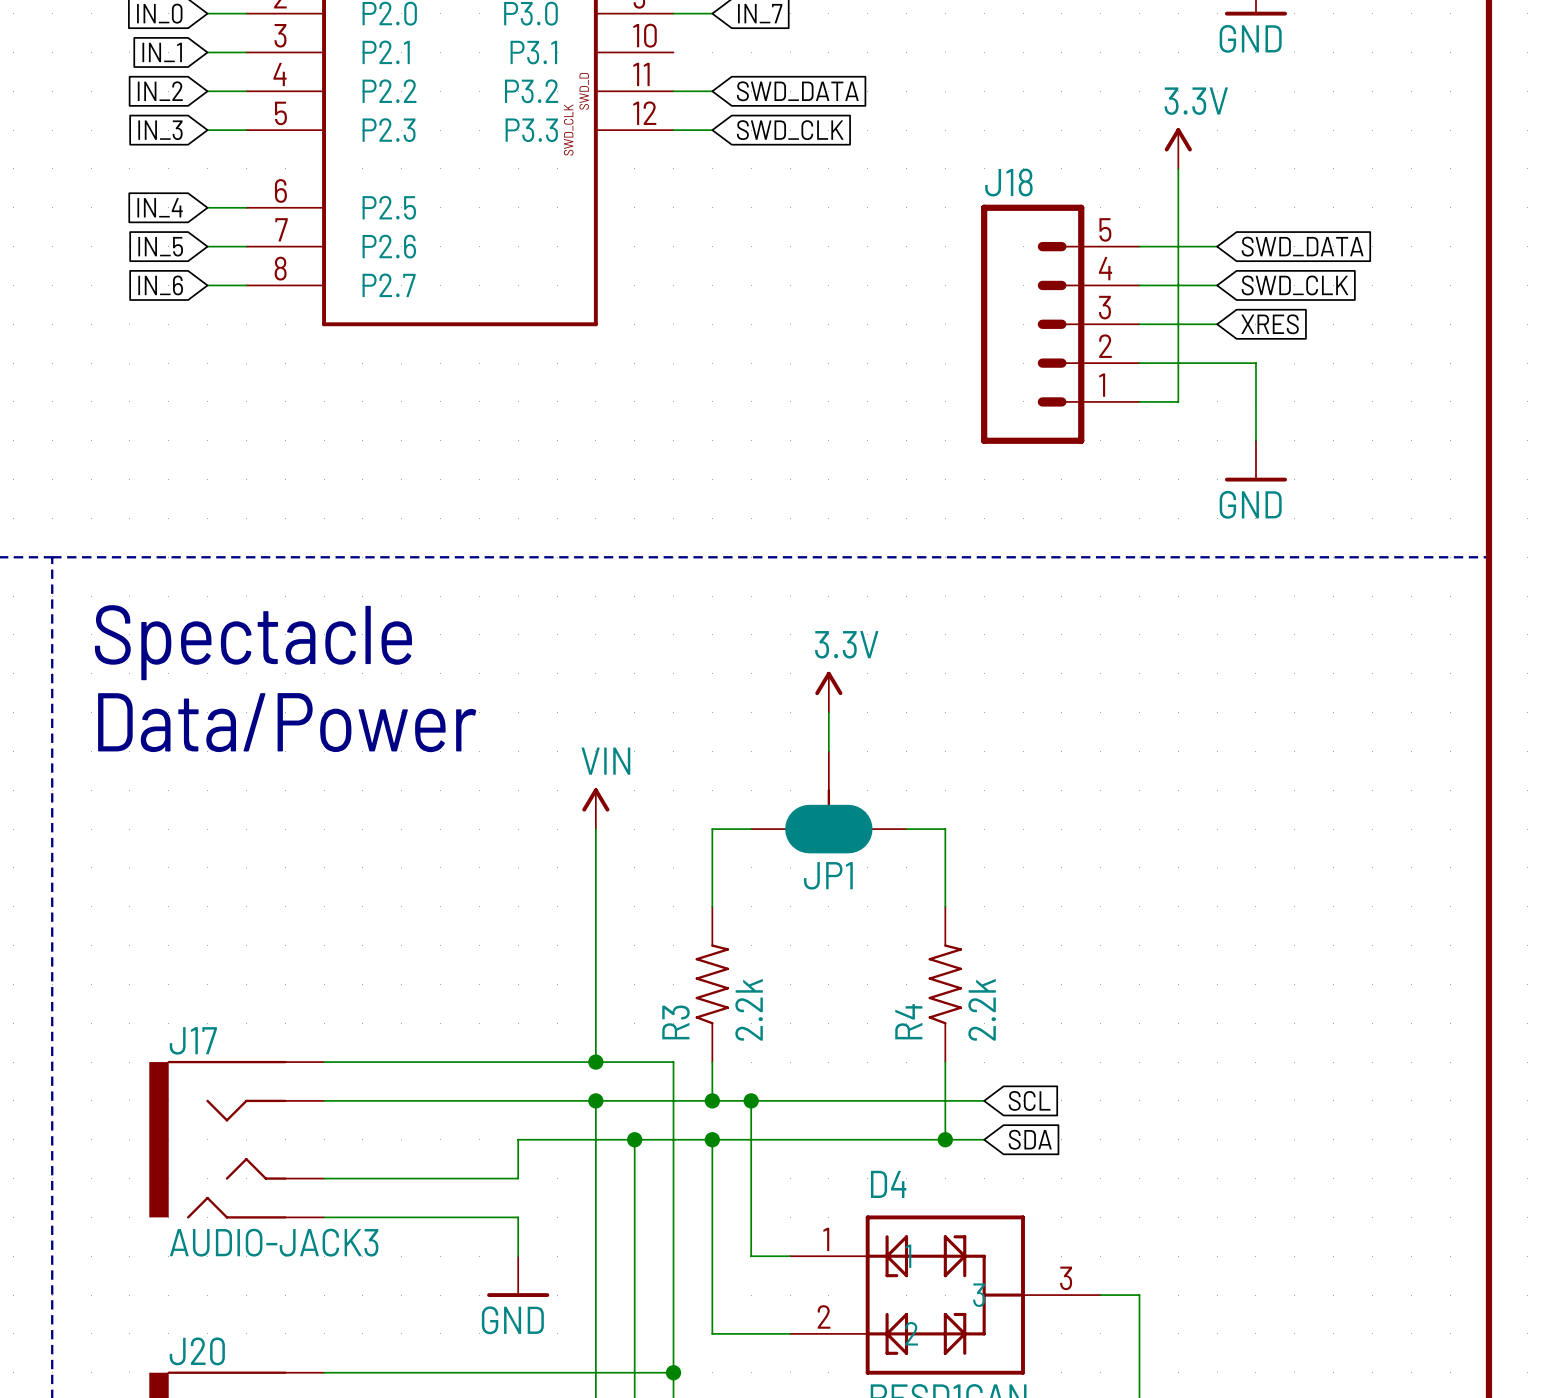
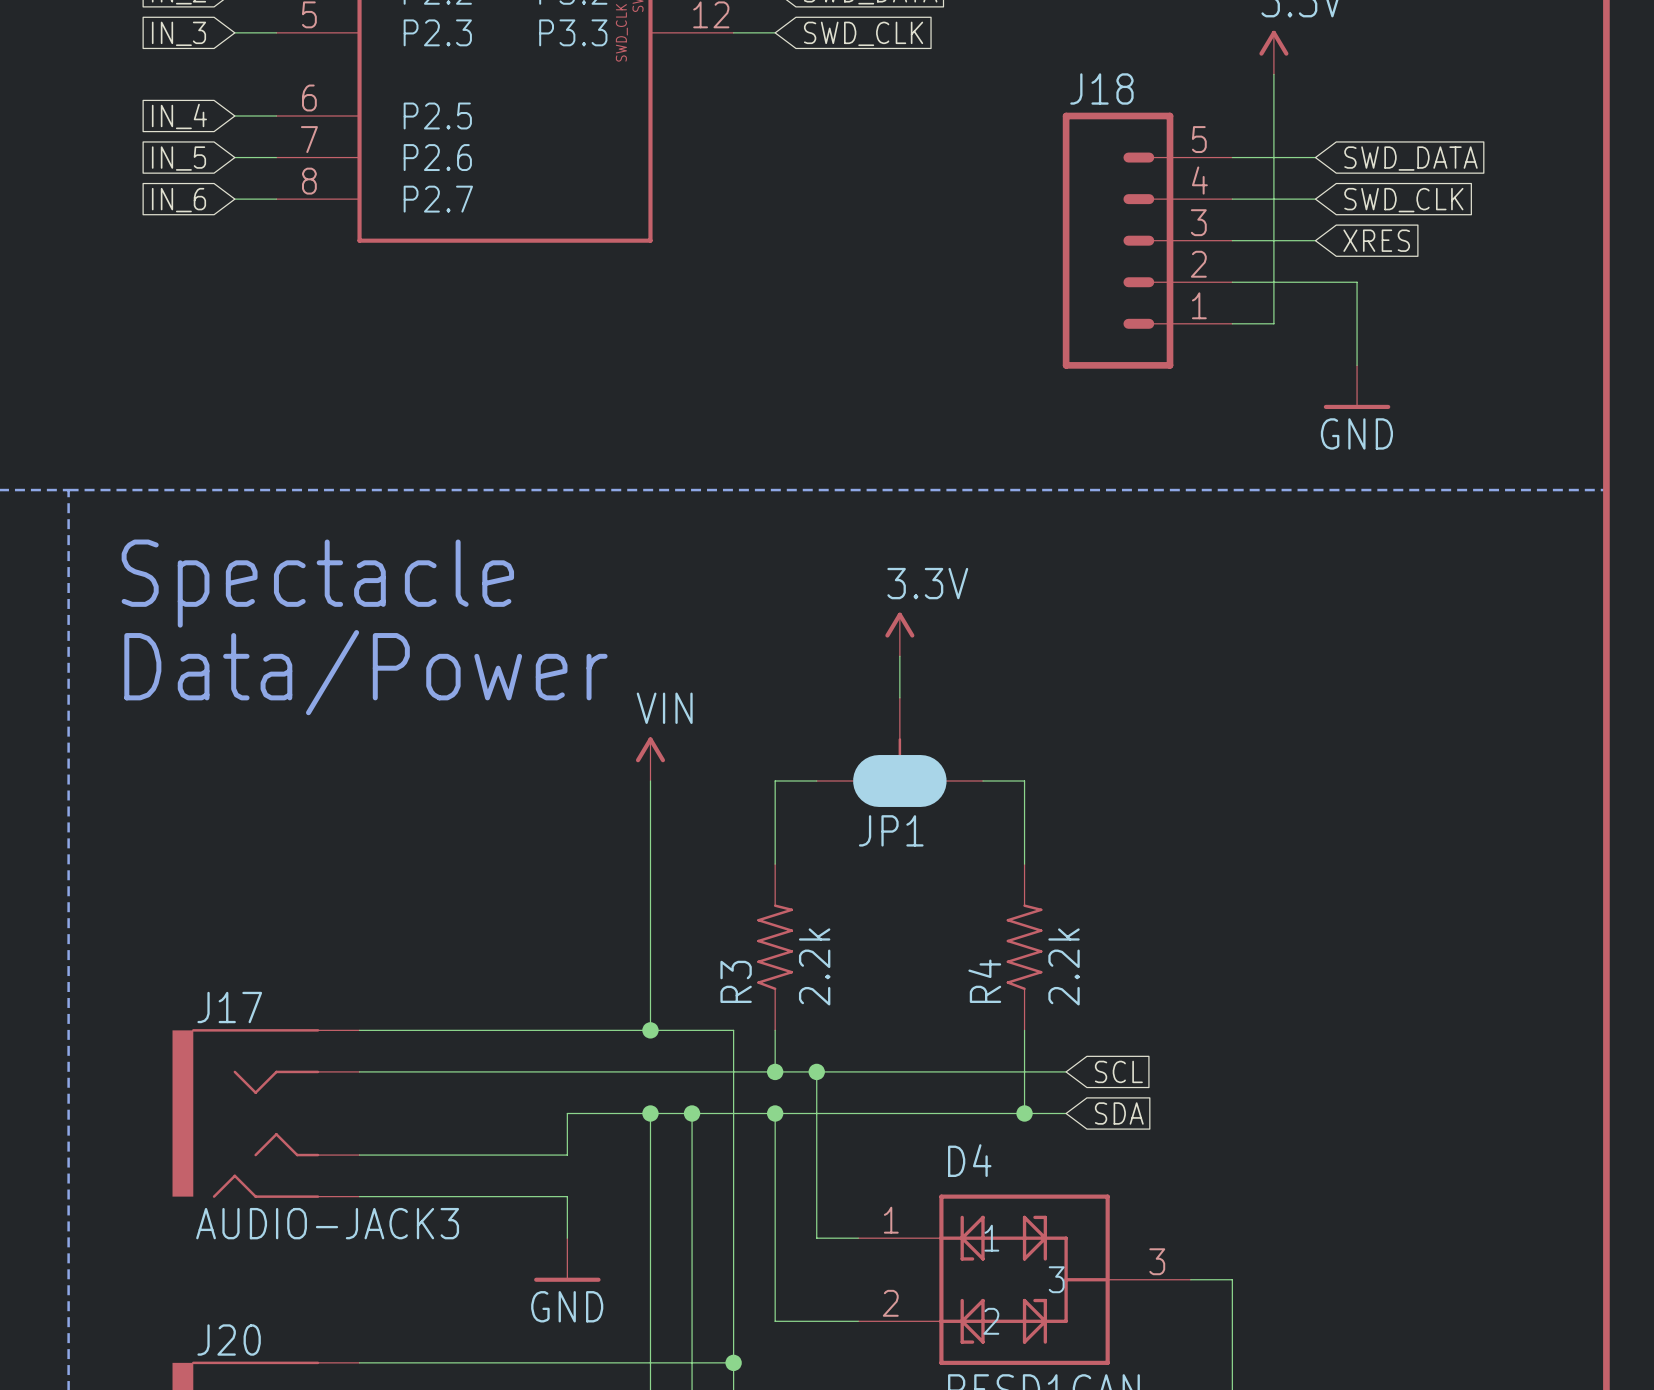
wire: (595, 1100) (595, 1139) -> none
junction position: (595, 1100) -> (650, 1113)

